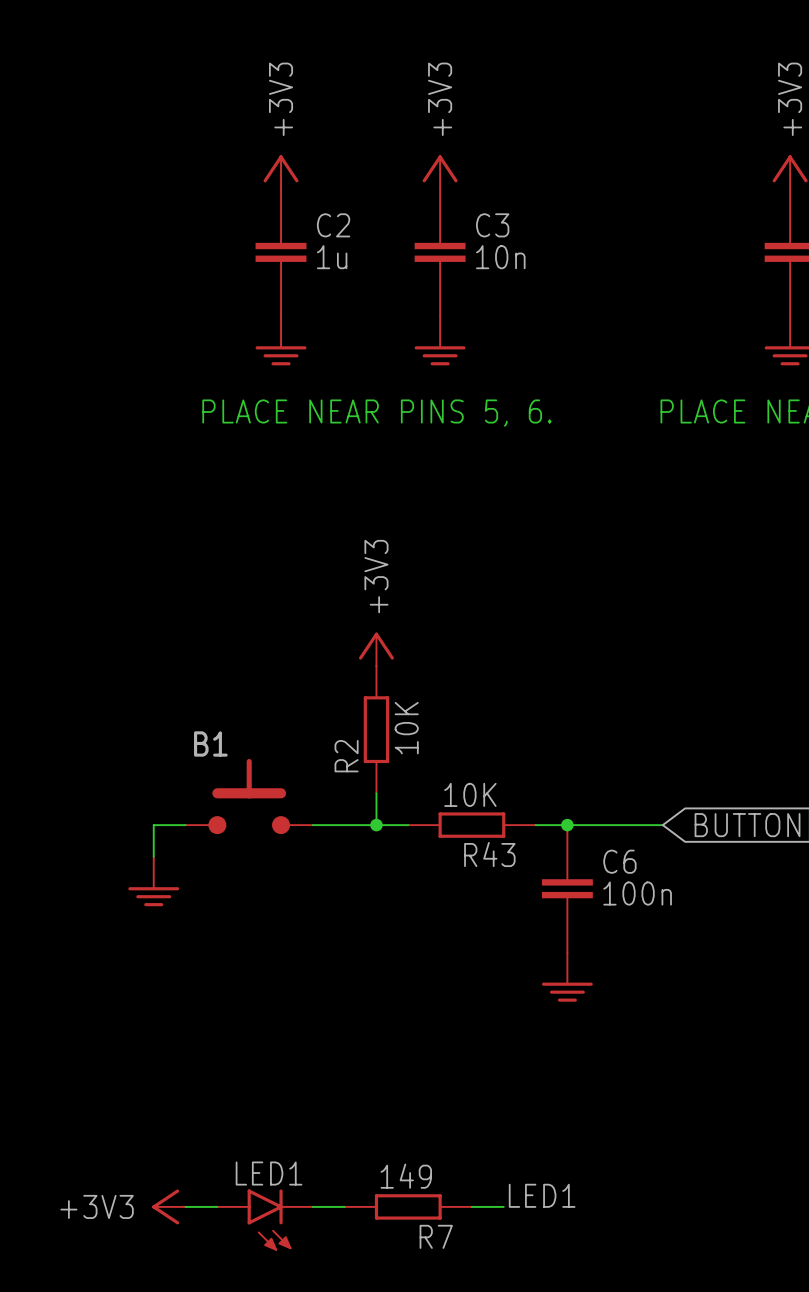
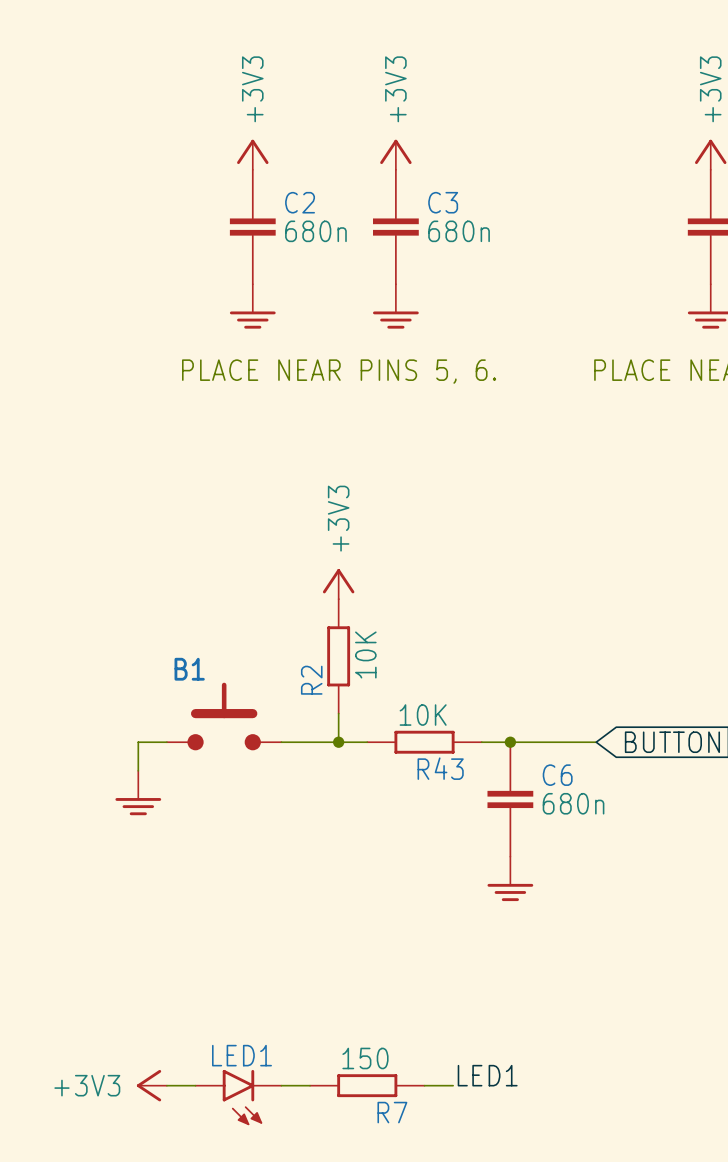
C2 value: 1u (332, 257) -> 680n (315, 231)
C3 value: 10n (500, 257) -> 680n (459, 231)
C6 value: 100n (637, 893) -> 680n (573, 803)
R7 value: 149 (406, 1176) -> 150 (365, 1058)

